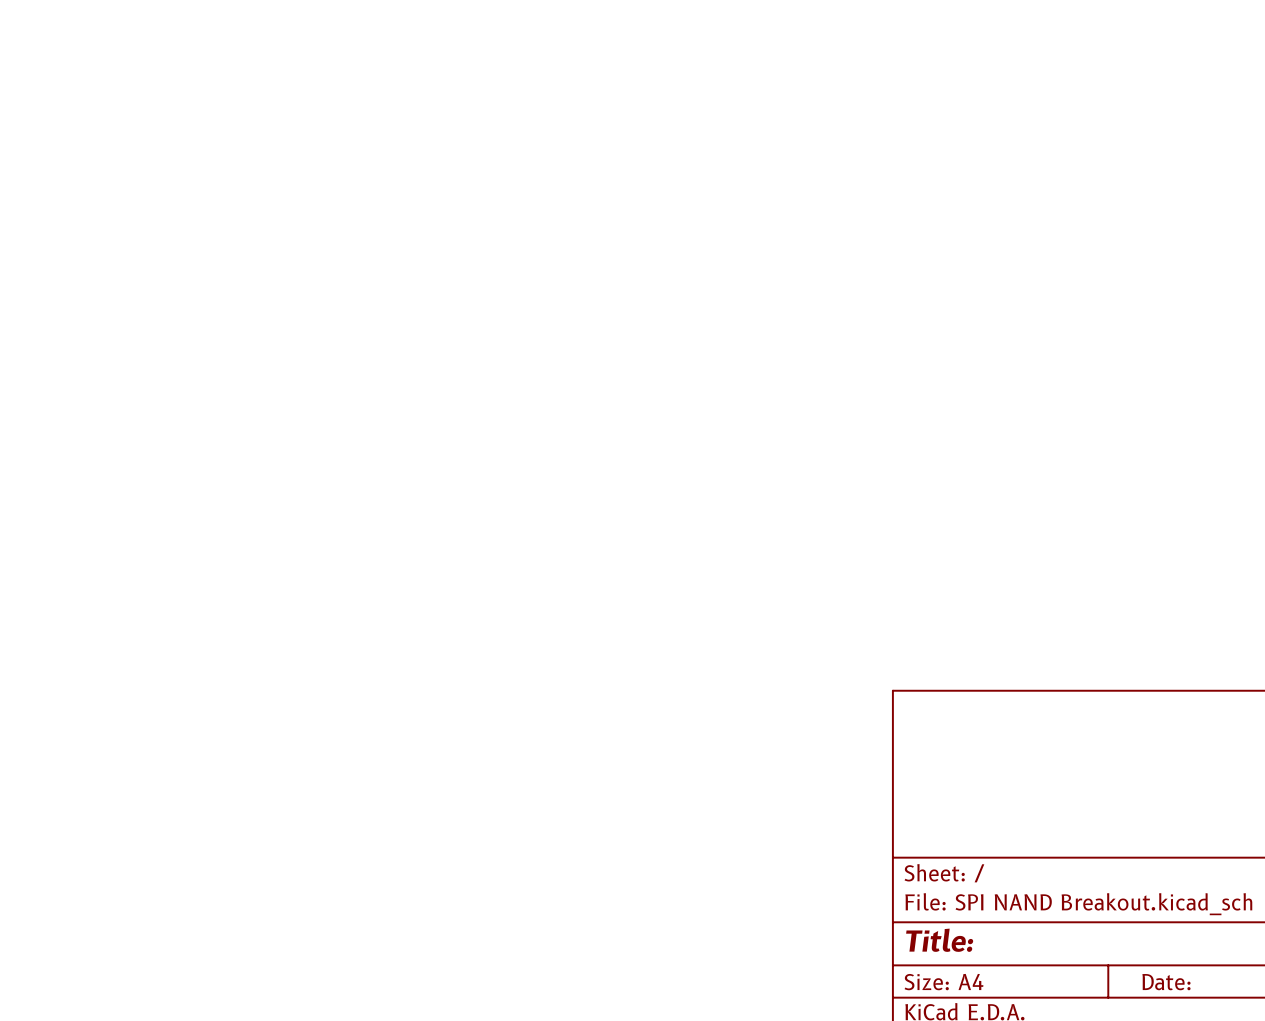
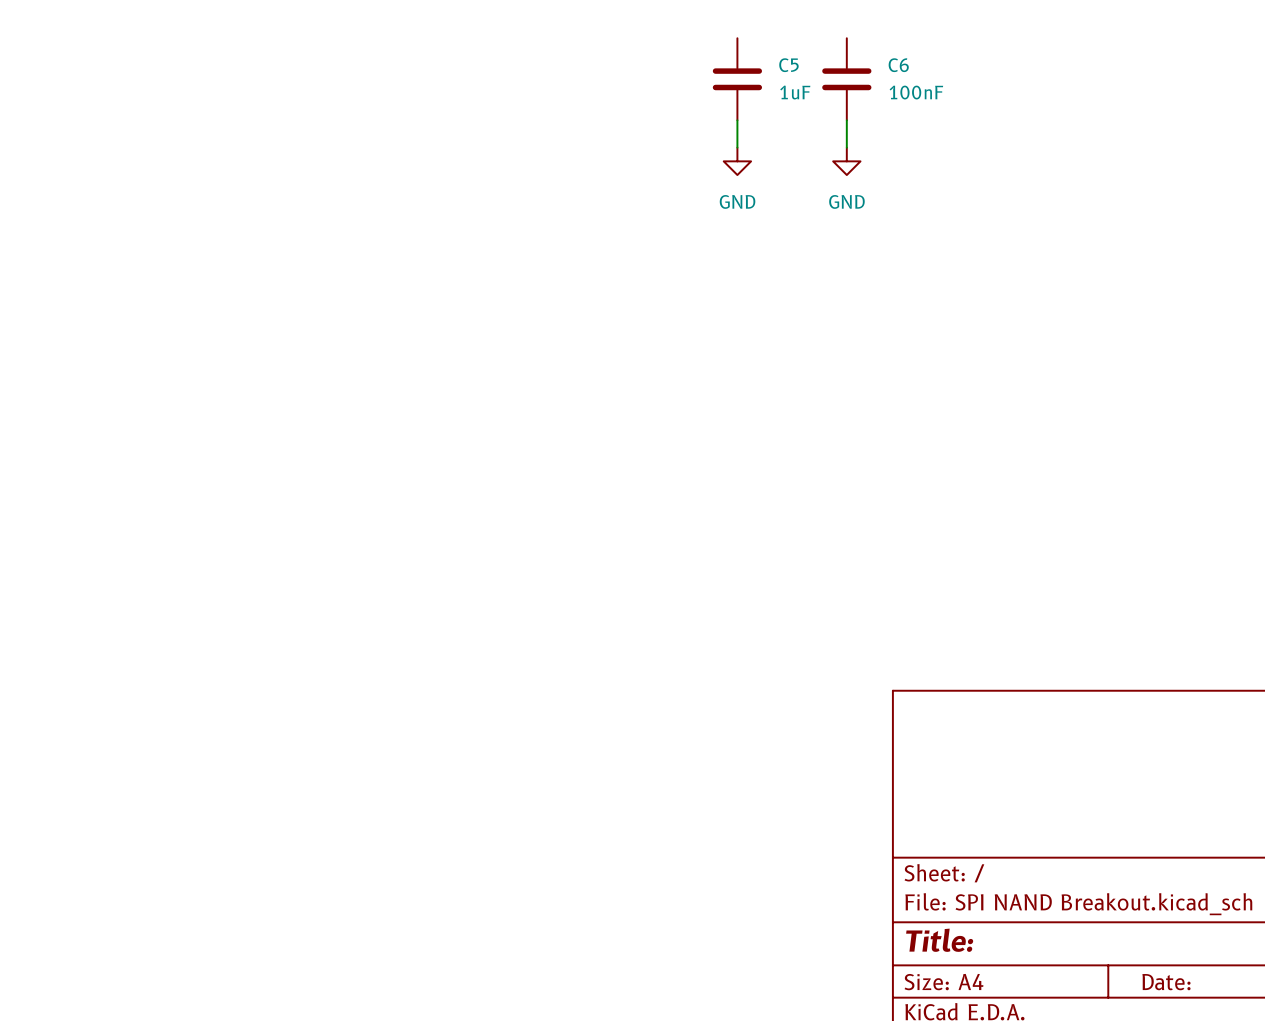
C5: none -> 1uF (737, 79)
C6: none -> 100nF (846, 79)
wire: none -> (737, 120) (737, 147)
wire: none -> (846, 120) (846, 147)
power symbol: none -> GND (737, 161)
power symbol: none -> GND (846, 161)

